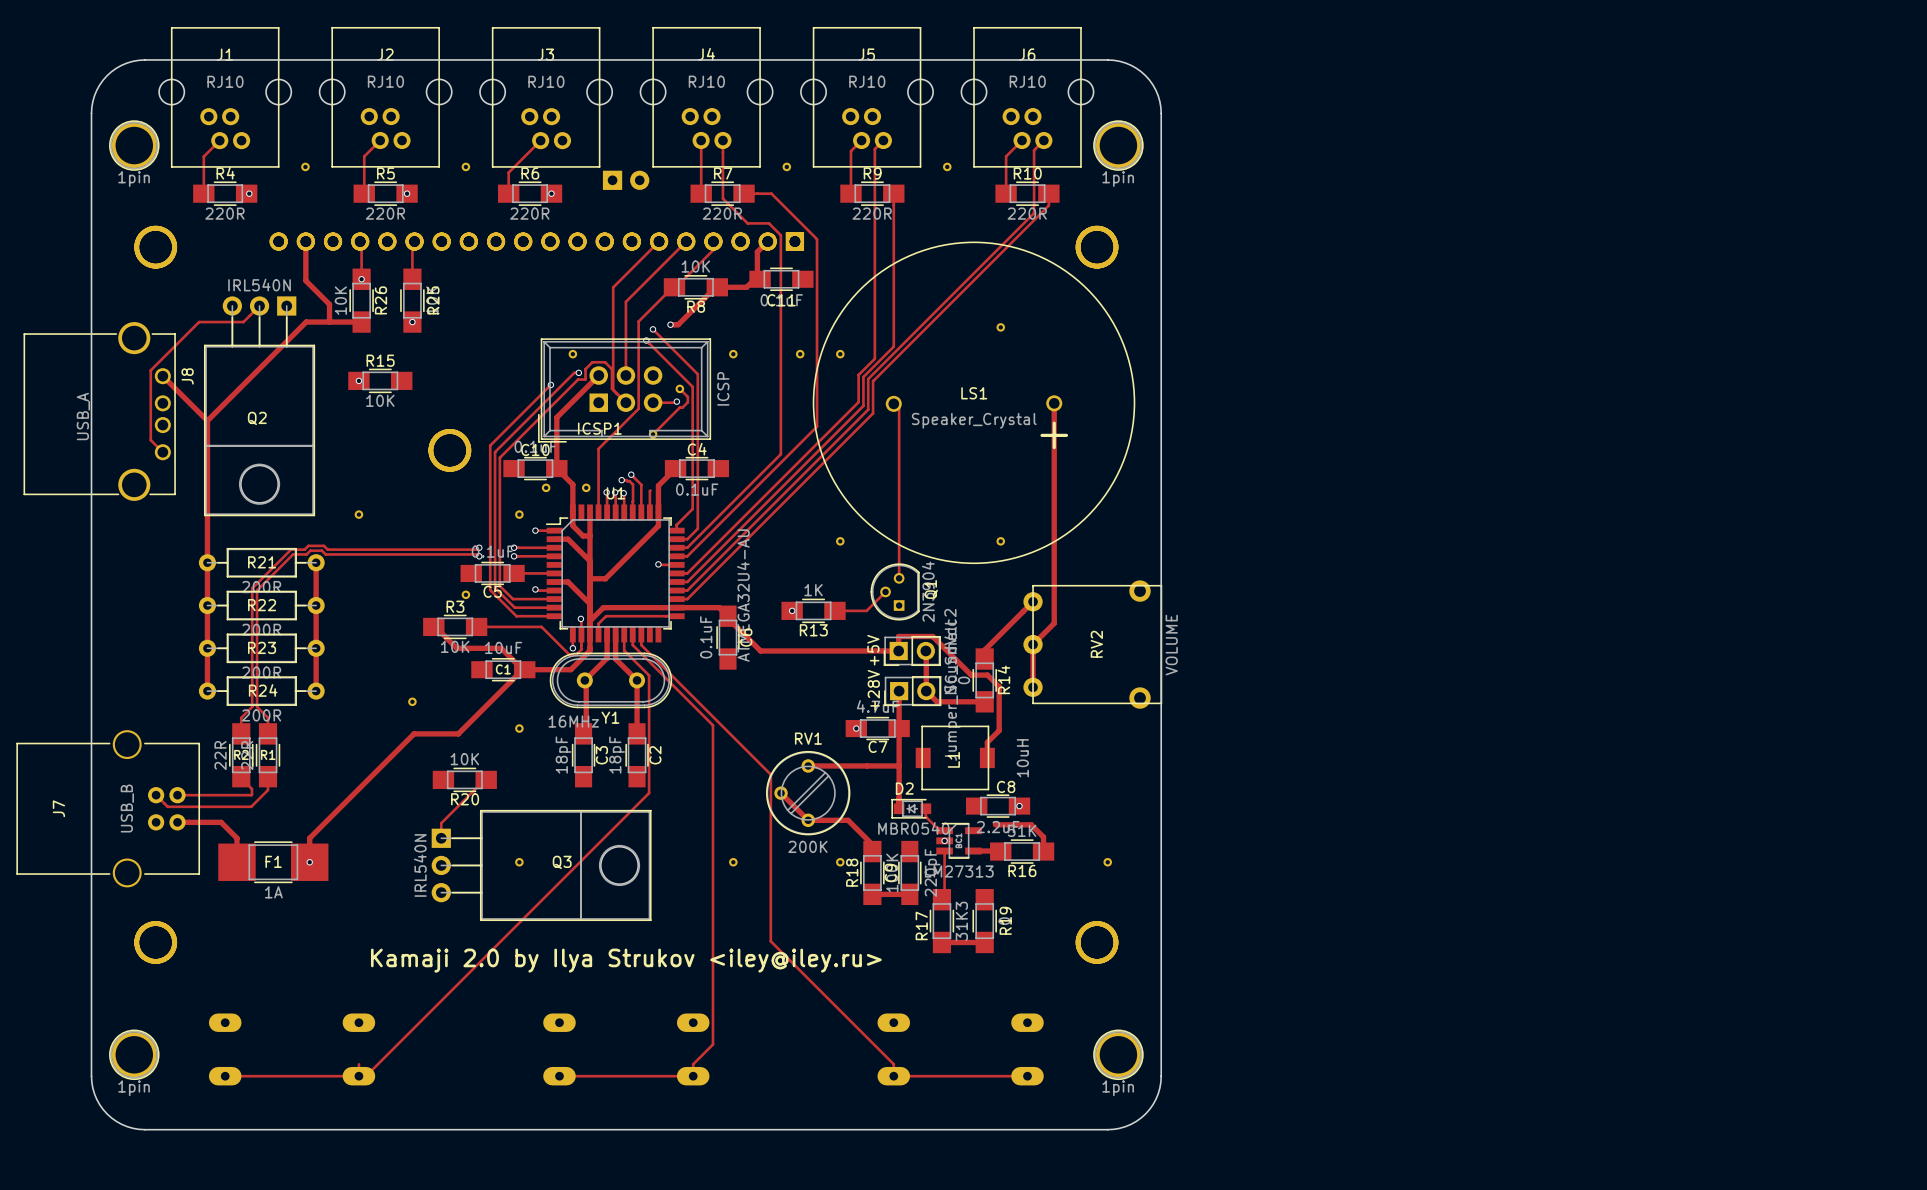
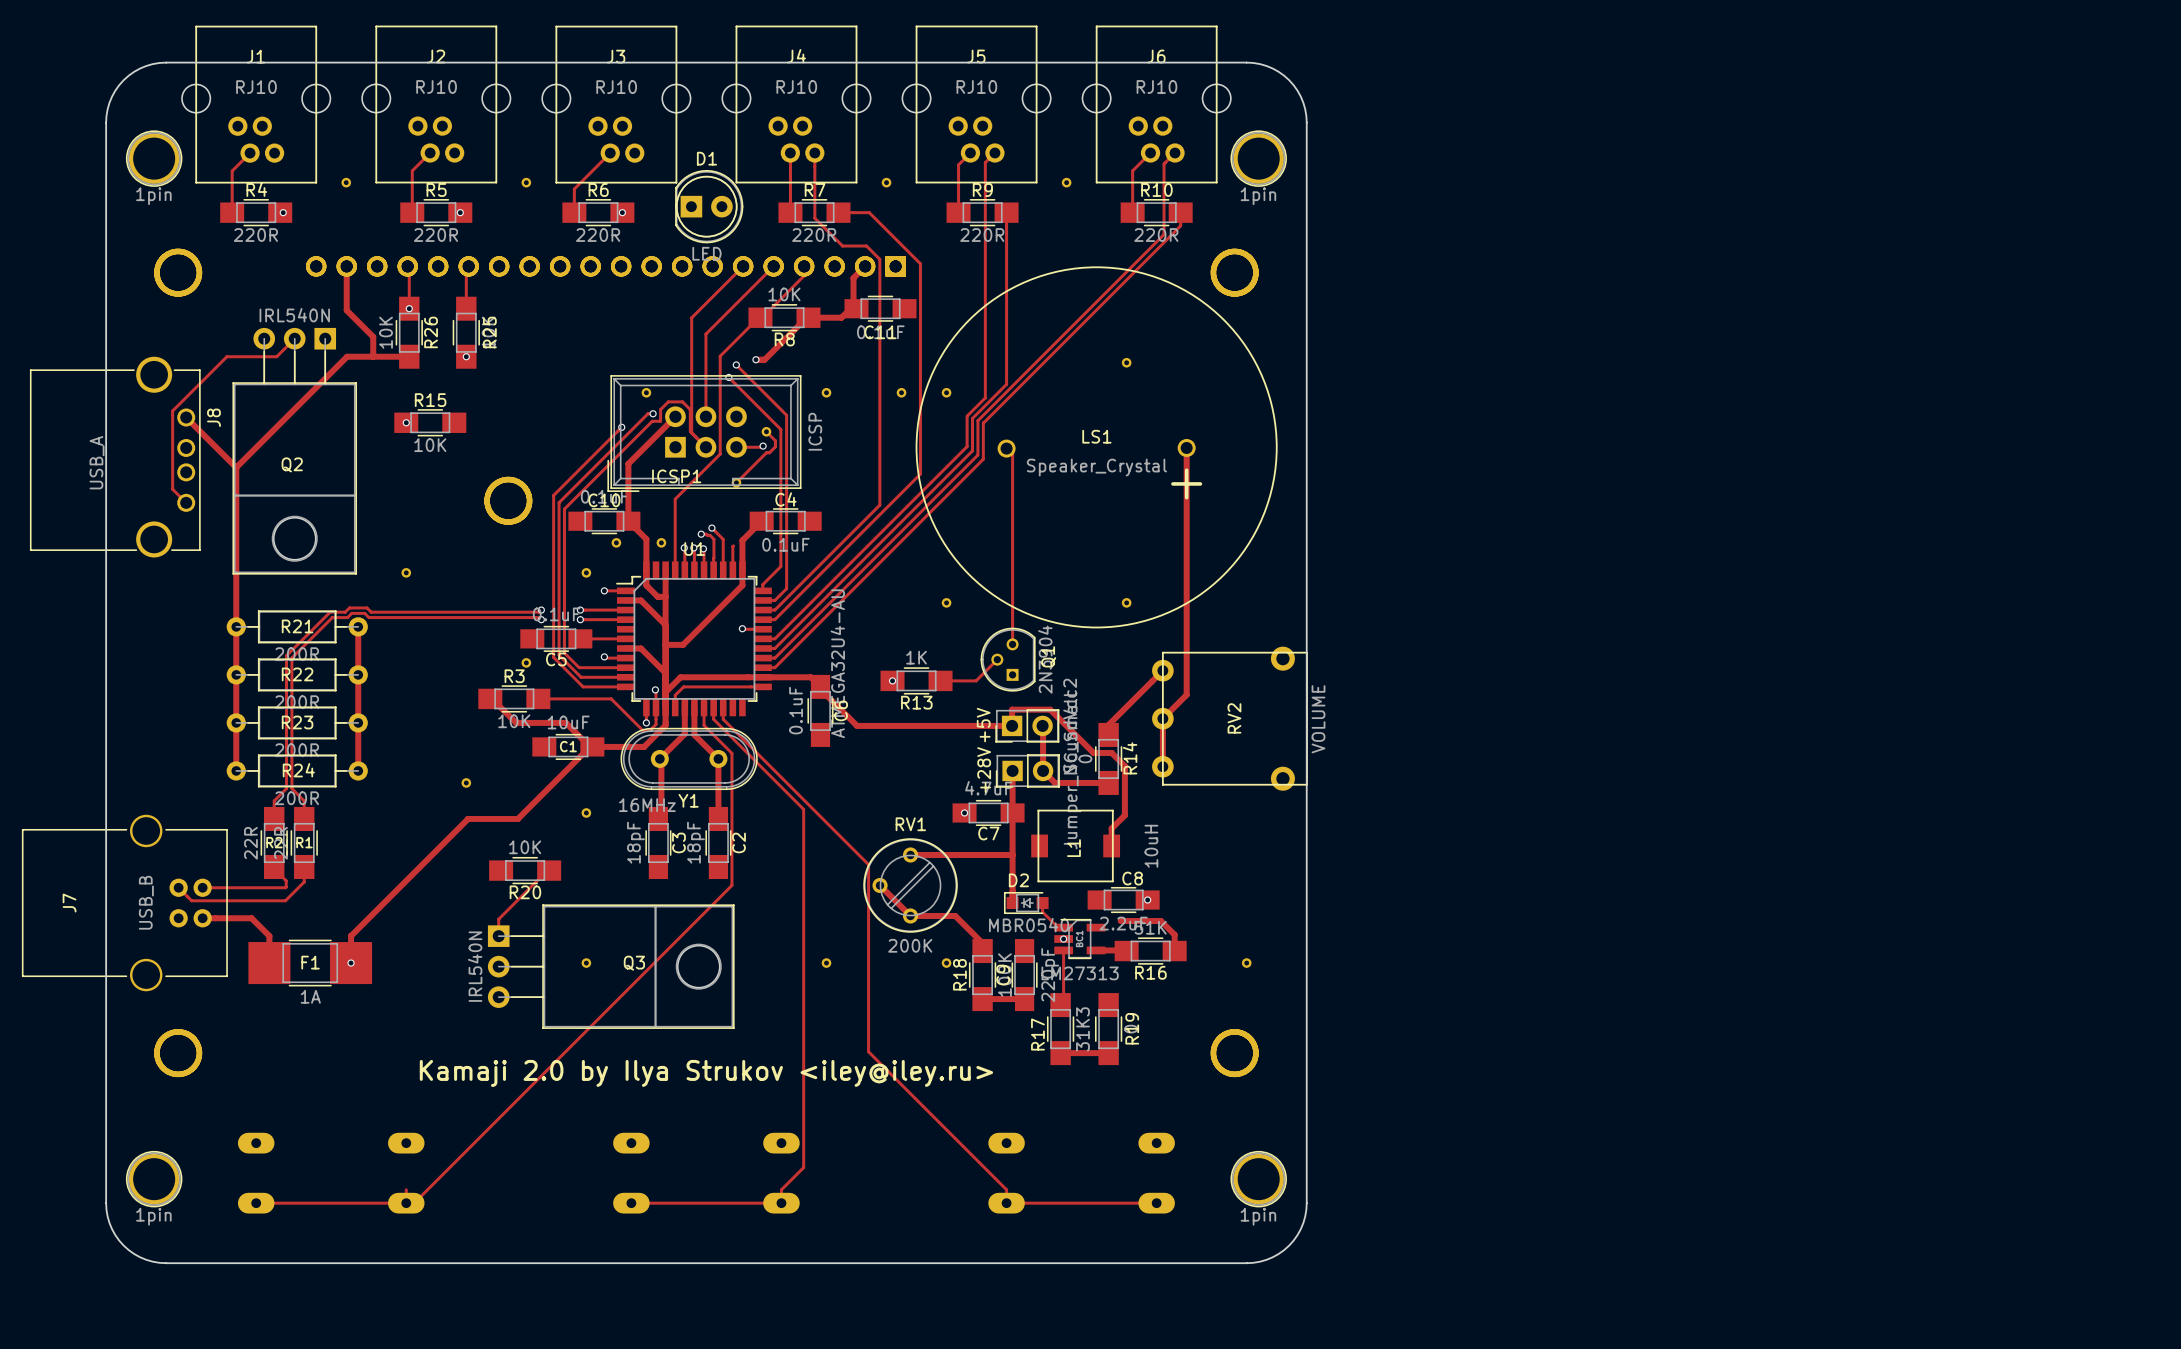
D1 side: bottom (626, 180) -> top (709, 206)

